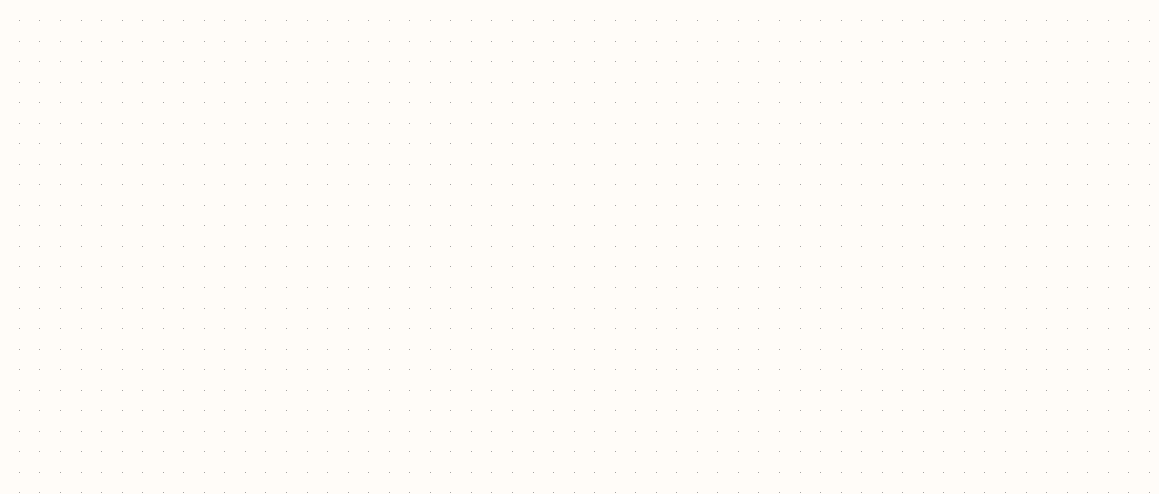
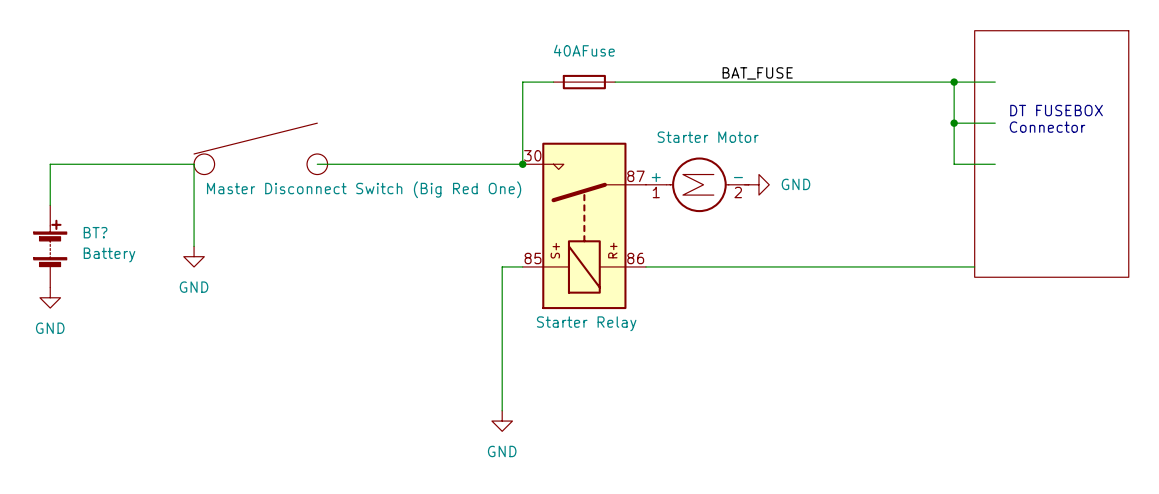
label: none -> BAT_FUSE (757, 73)
wire: none -> (553, 82) (522, 82) (522, 164) (317, 164)
part: none -> 40AFuse (584, 82)
wire: none -> (615, 82) (995, 82)
wire: none -> (954, 82) (954, 164) (995, 164)
junction: none -> (954, 82)
text: none -> DT FUSEBOX (1056, 110)
wire: none -> (954, 123) (995, 123)
junction: none -> (954, 123)
text: none -> Connector (1047, 127)
part: none -> Master Disconnect Switch (Big Red One) (260, 148)
part: none -> (1051, 153)
junction: none -> (522, 164)
part: none -> Starter Motor (697, 184)
power symbol: none -> GND (758, 184)
wire: none -> (50, 205) (50, 164) (194, 164) (194, 246)
part: none -> Starter Relay (584, 225)
BT?: none -> Battery (50, 246)
power symbol: none -> GND (194, 256)
wire: none -> (522, 266) (502, 266) (502, 410)
wire: none -> (645, 266) (974, 266)
power symbol: none -> GND (50, 297)
power symbol: none -> GND (502, 421)

